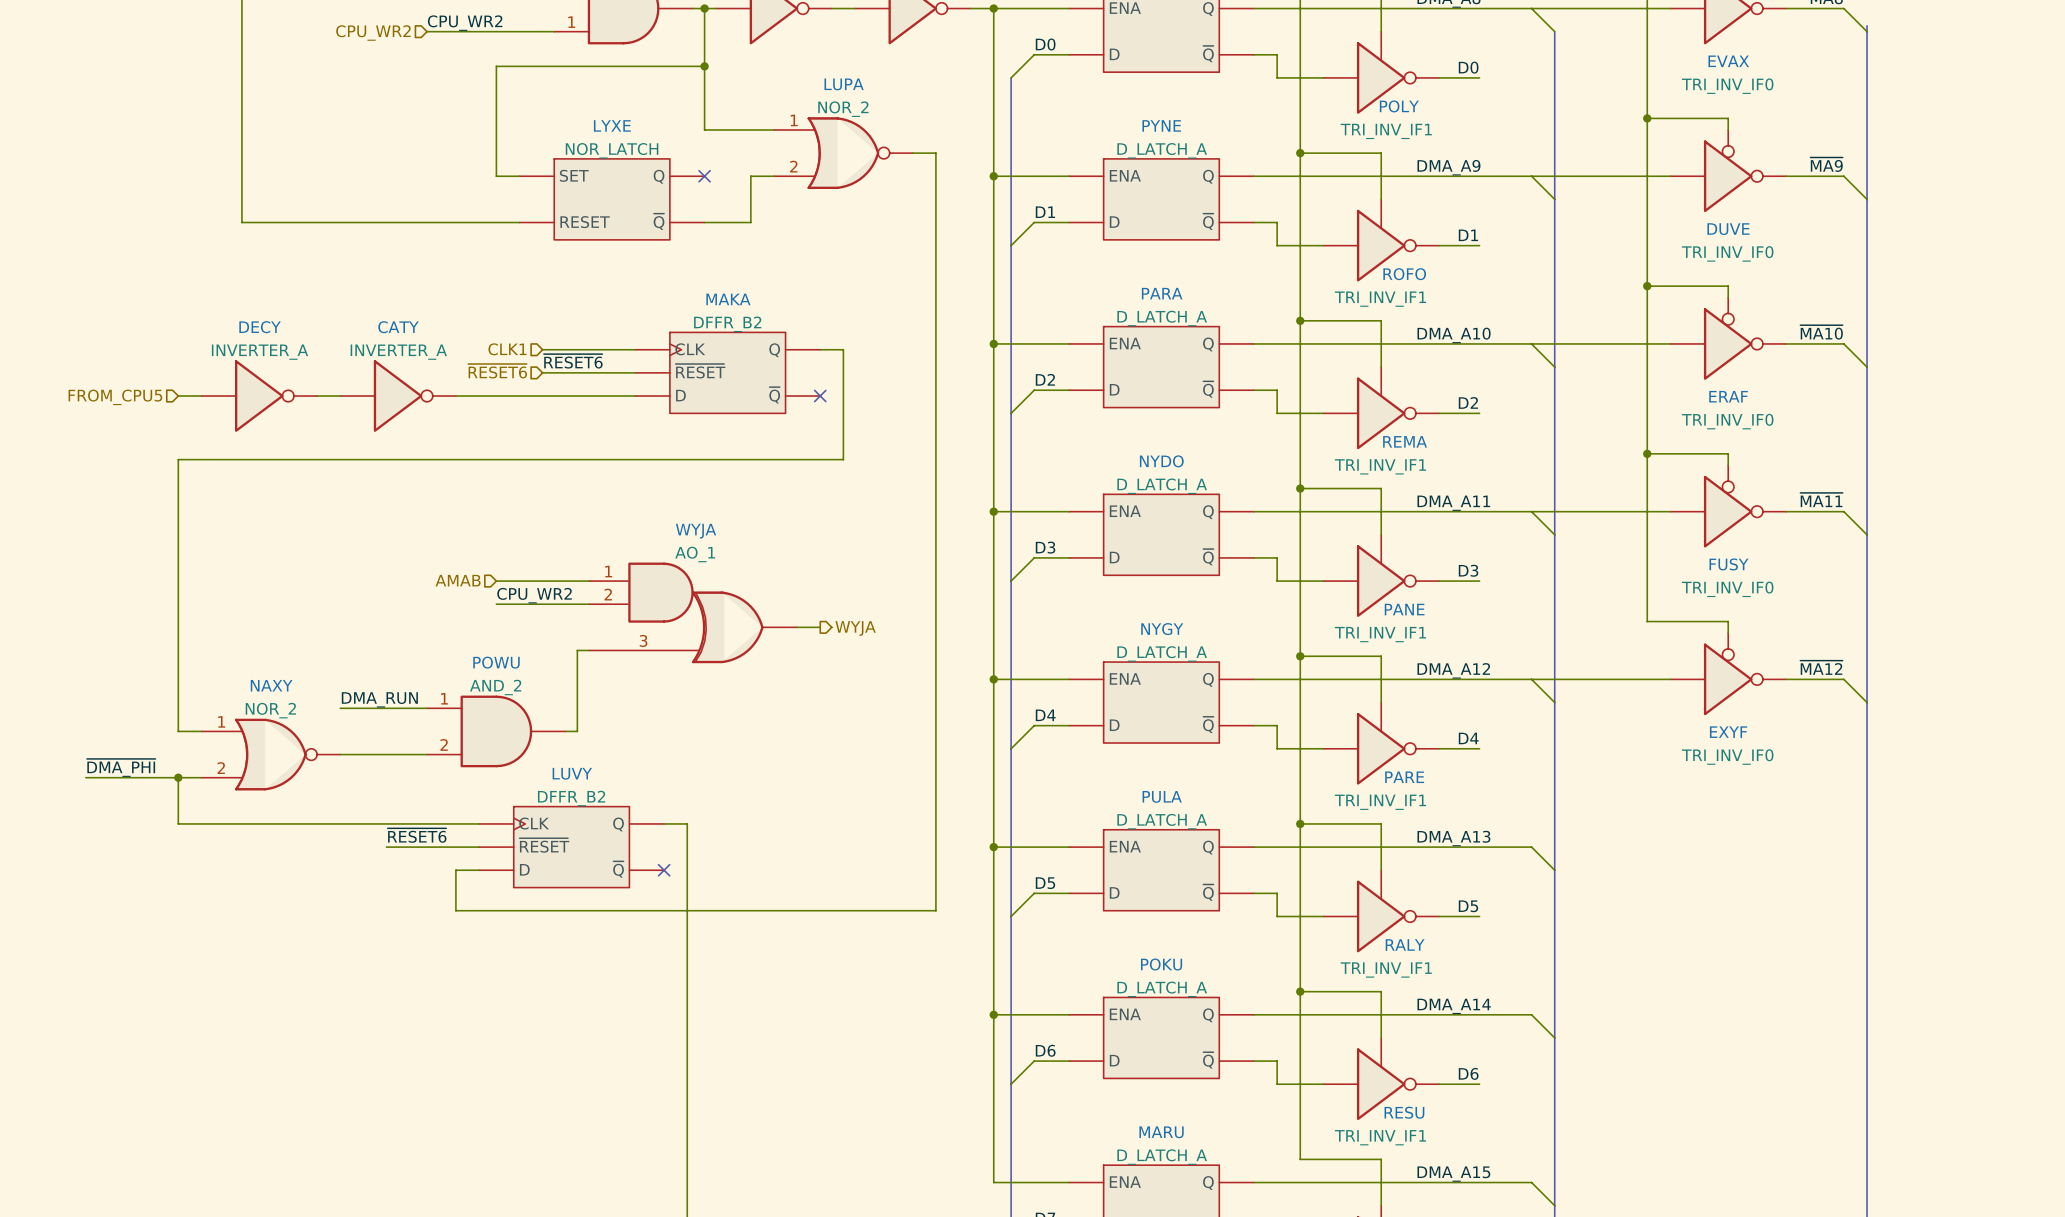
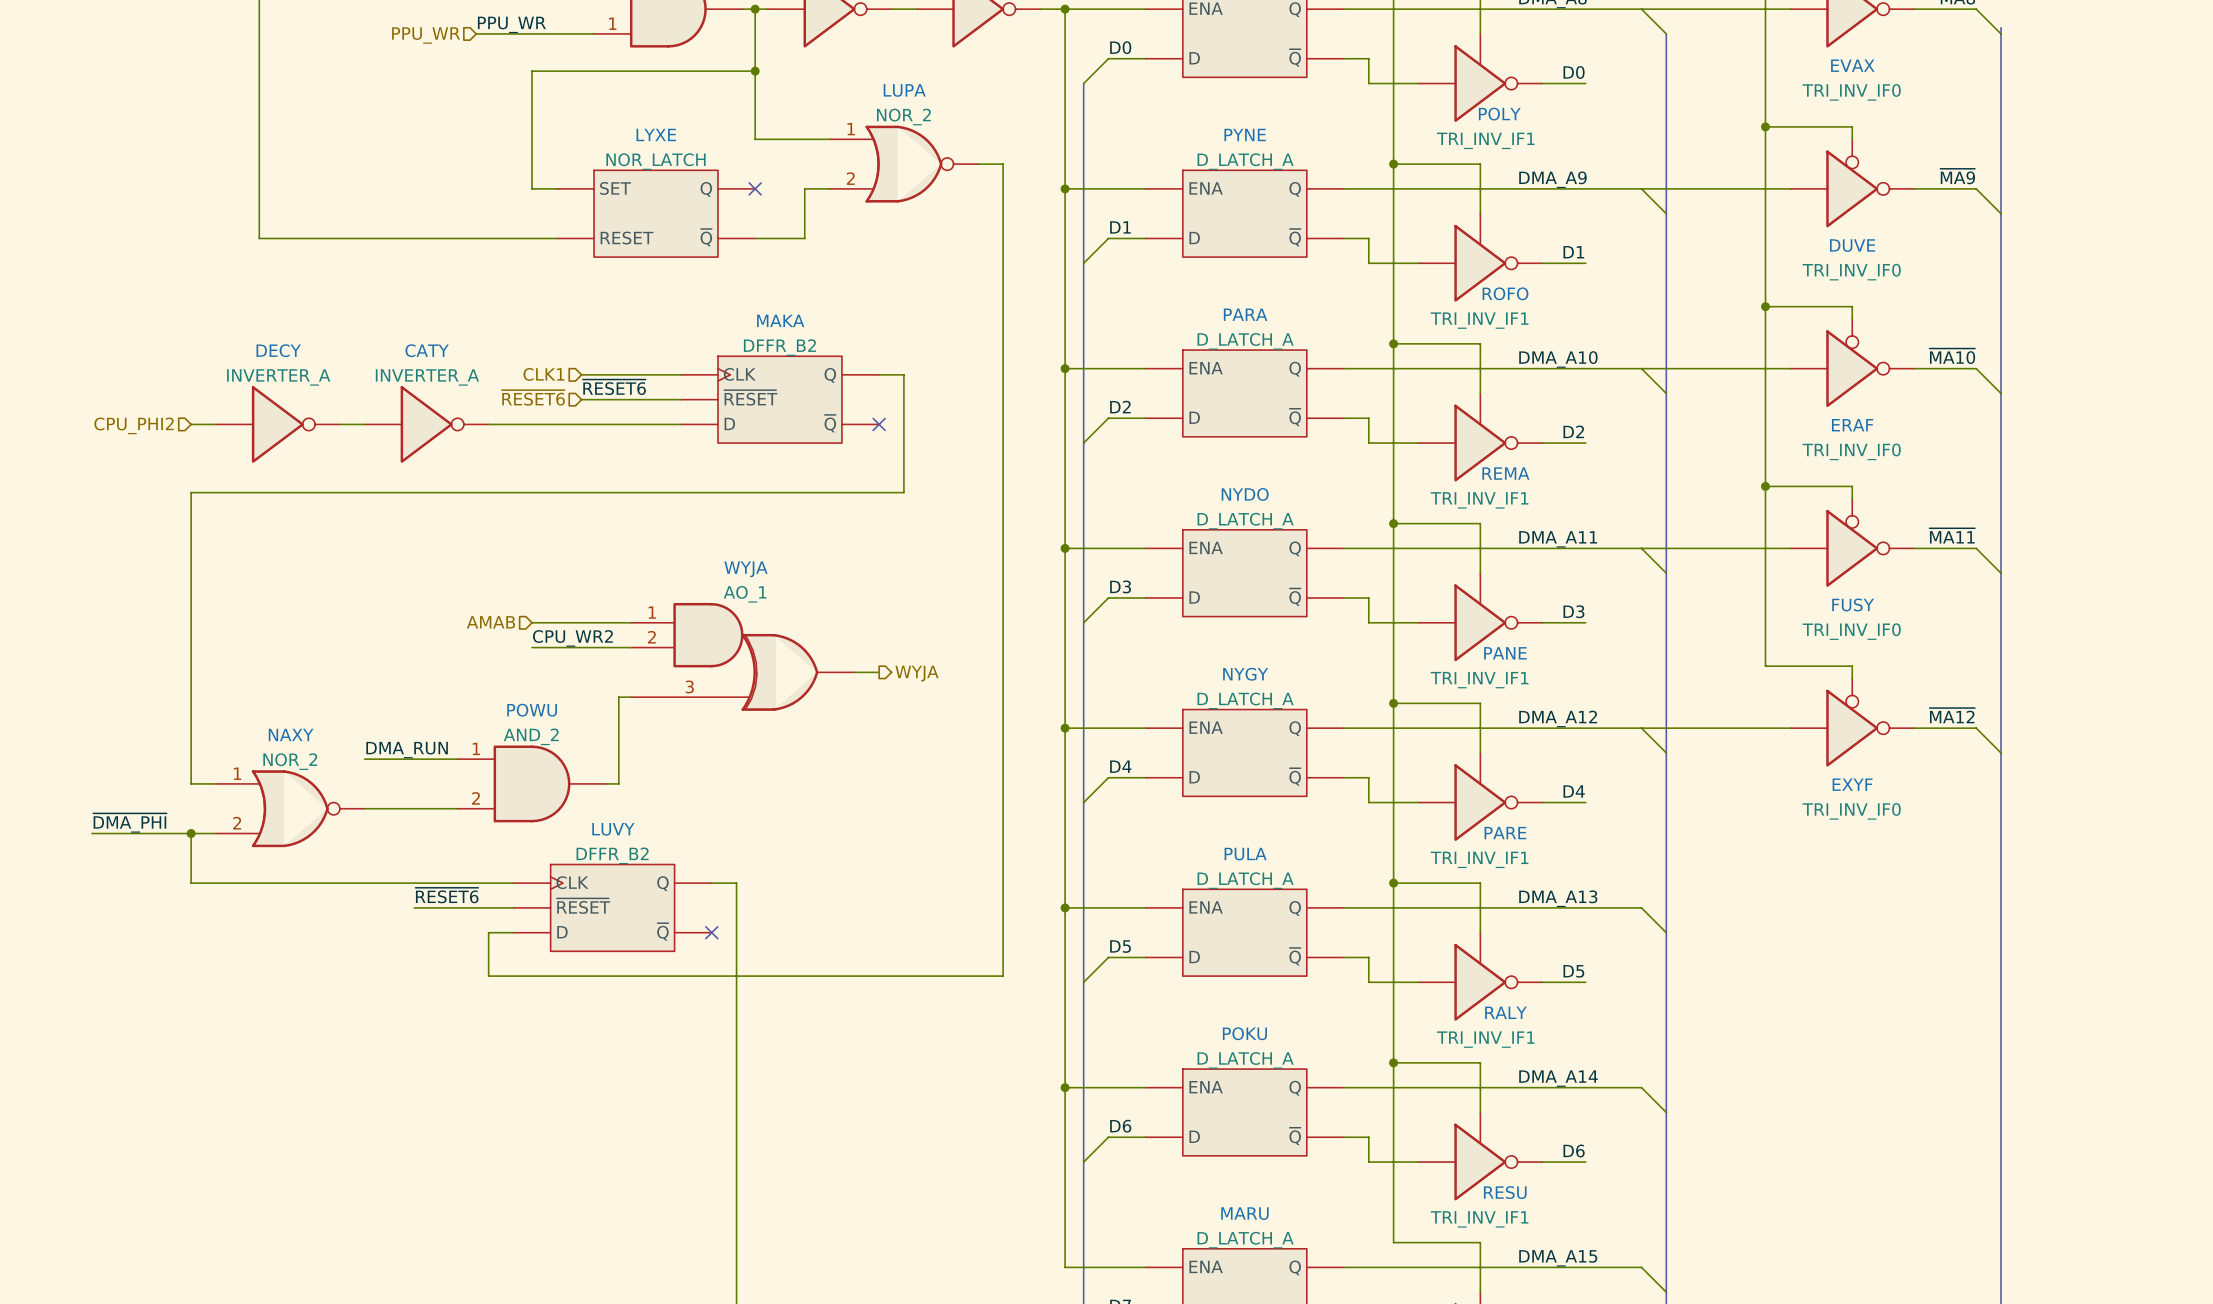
label: CPU_WR2 (465, 23) -> PPU_WR (511, 24)
wire: (427, 31) (444, 31) -> none
hierarchical label: CPU_WR2 (373, 33) -> PPU_WR (426, 35)
hierarchical label: FROM_CPU5 (115, 397) -> CPU_PHI2 (134, 425)

